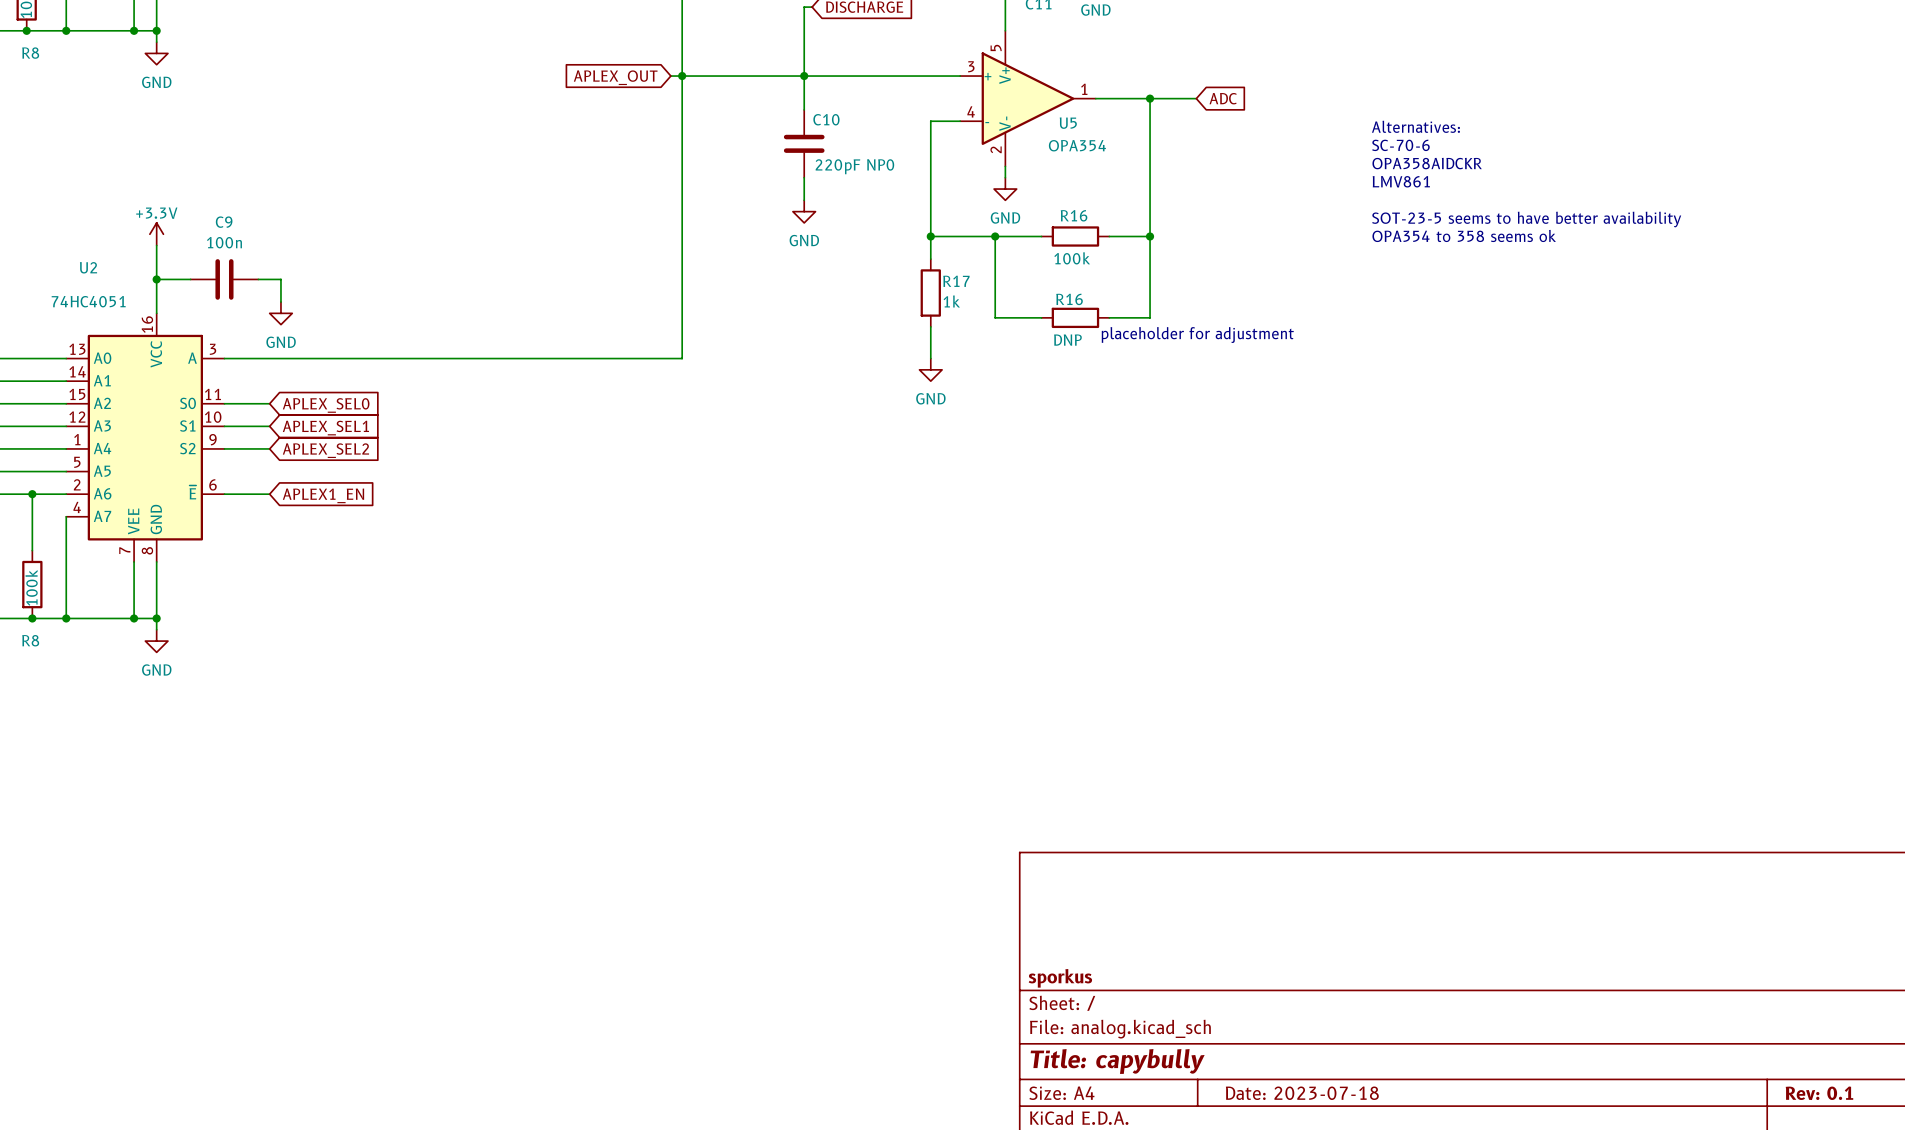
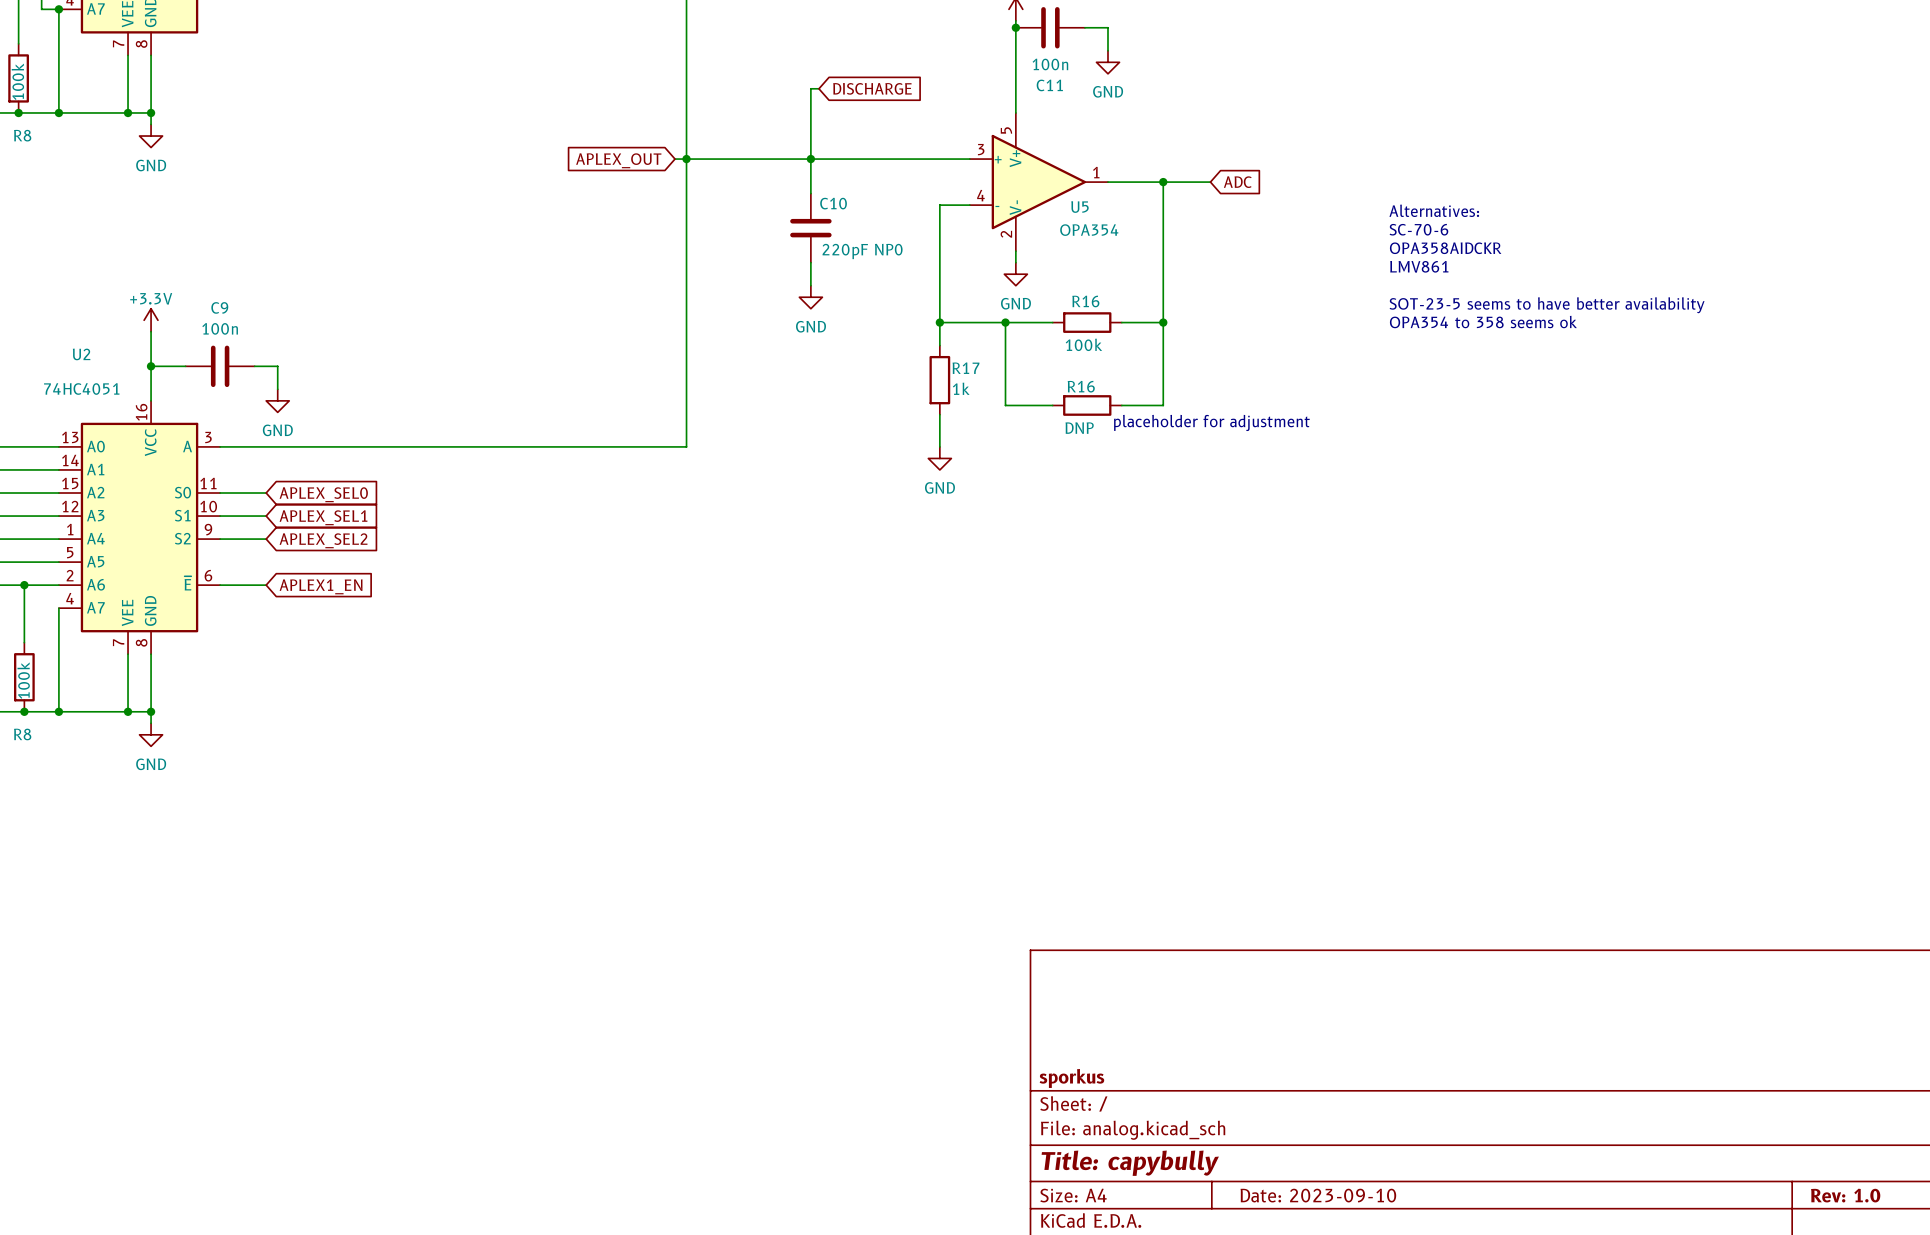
title block: Date: 2023-07-18 (1302, 1093) -> Date: 2023-09-10 (1318, 1195)
title block: Rev: 0.1 (1819, 1093) -> Rev: 1.0 (1845, 1195)

